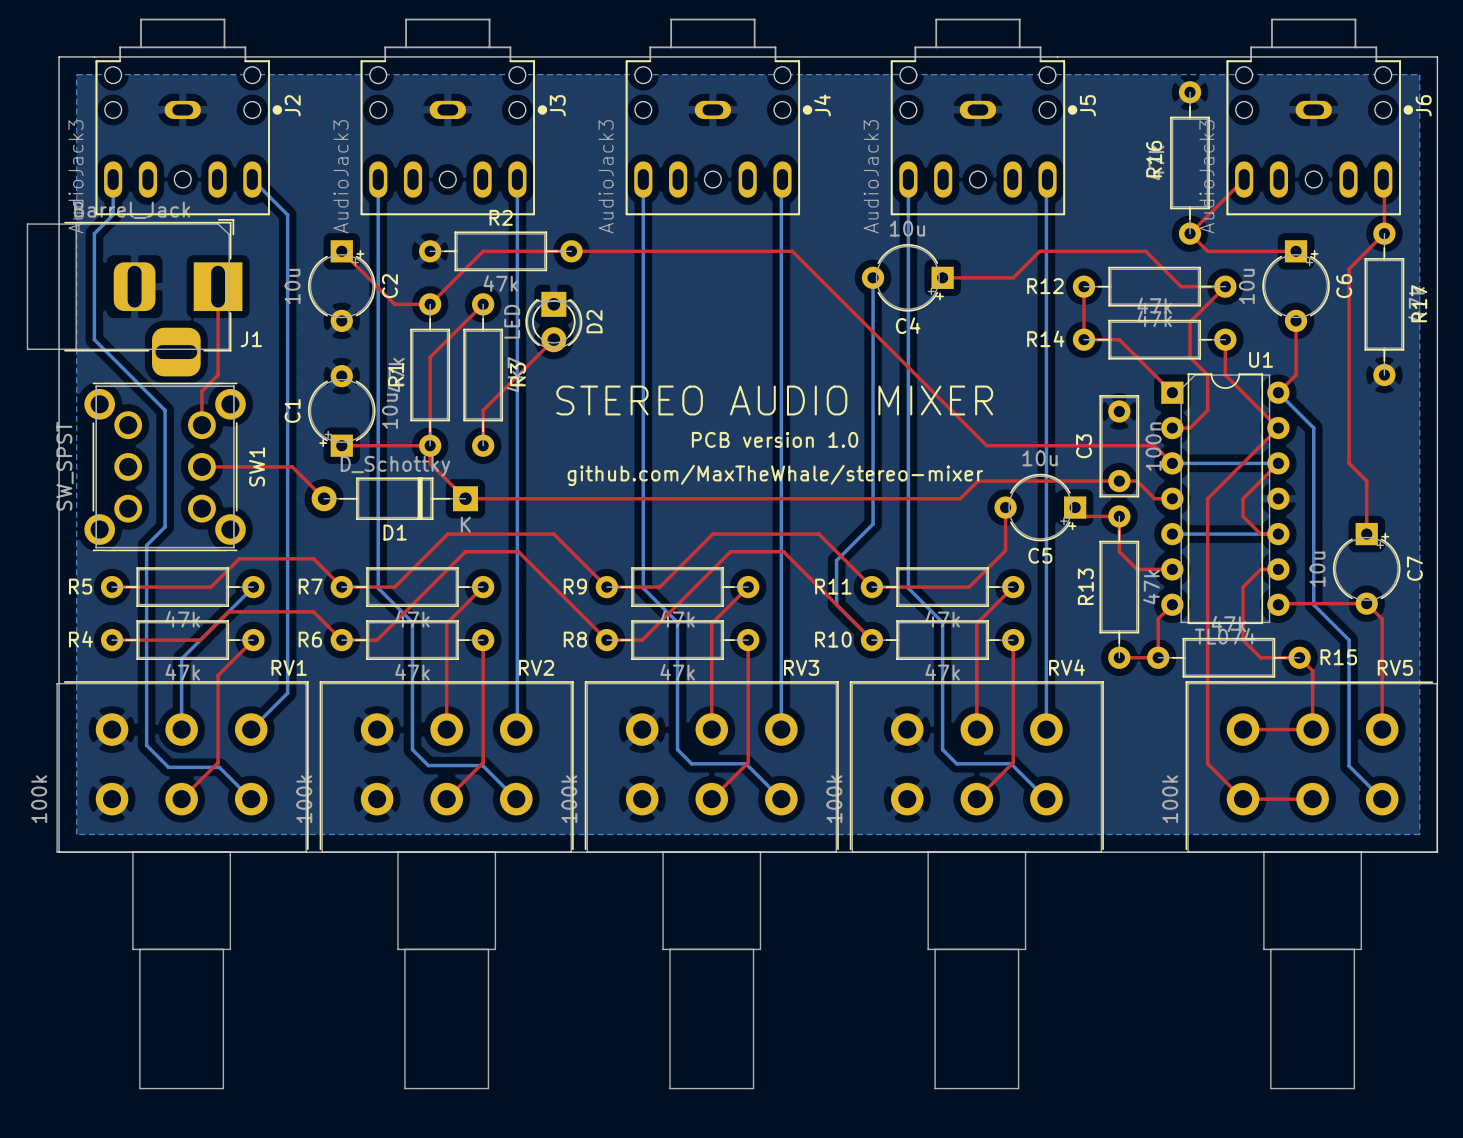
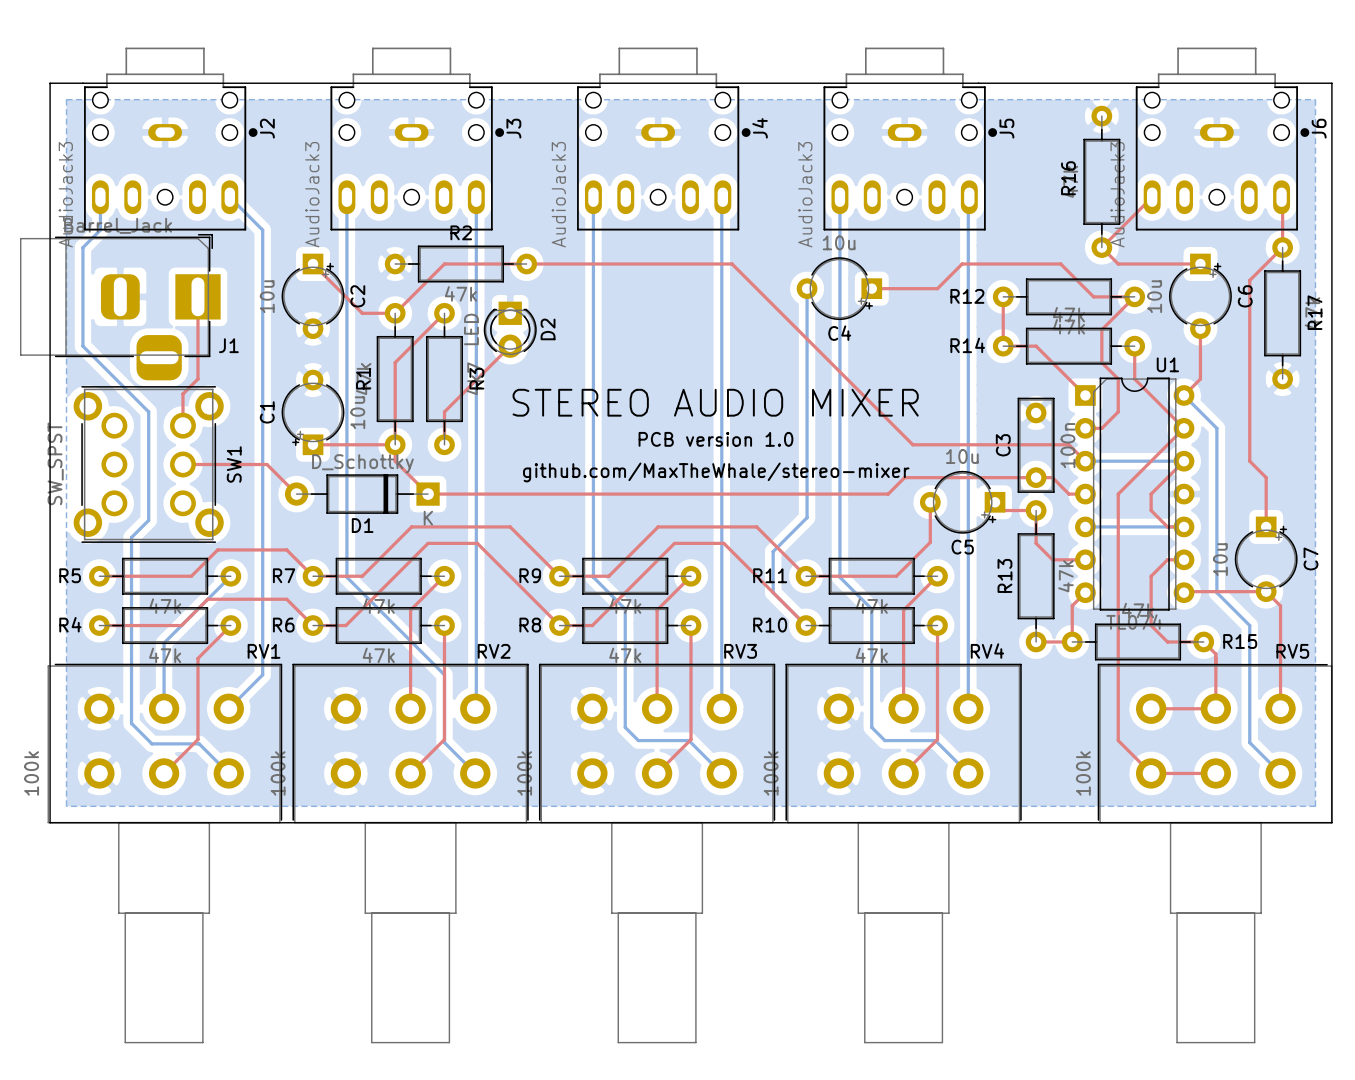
bottom track: (412, 622) (412, 749) (428, 765) (483, 766) -> (378, 609) (444, 674) (444, 742)

